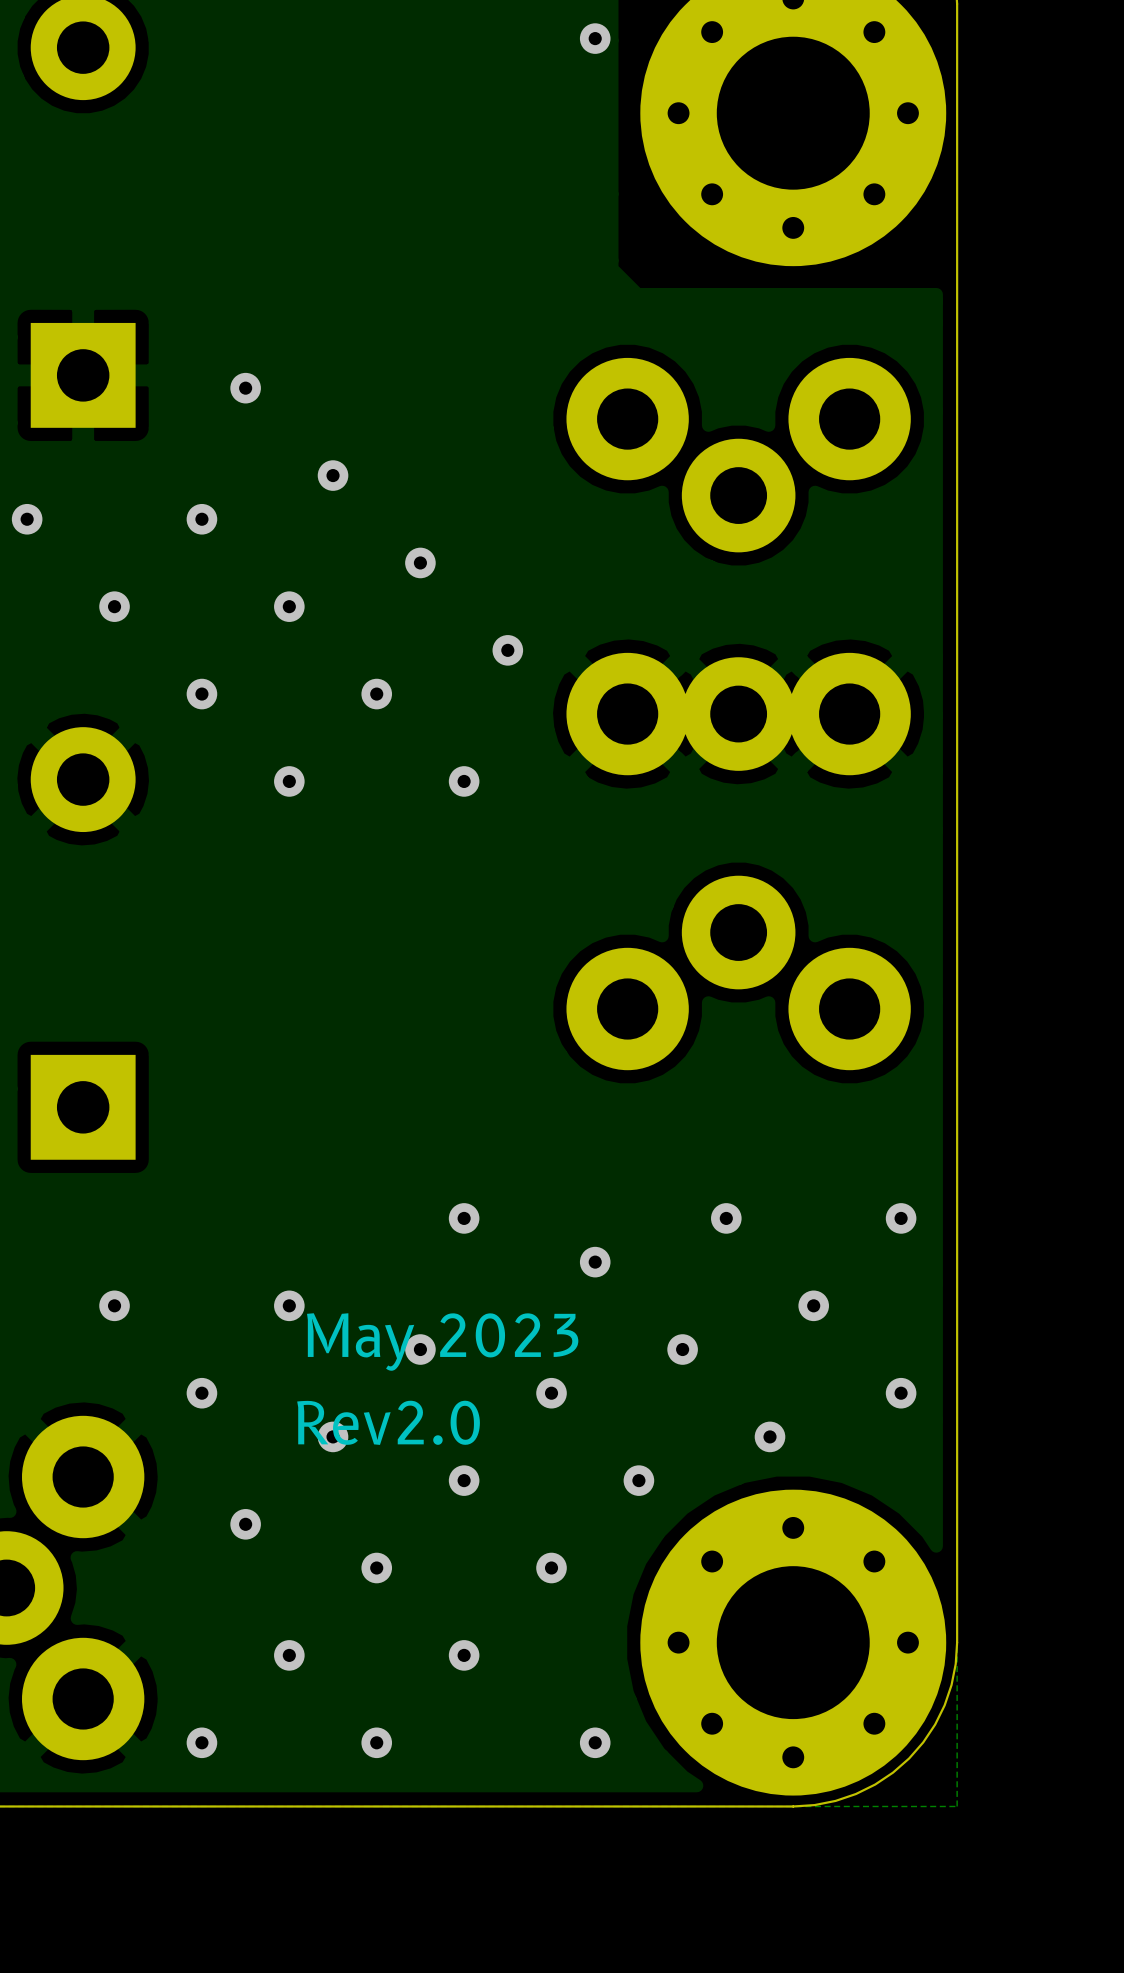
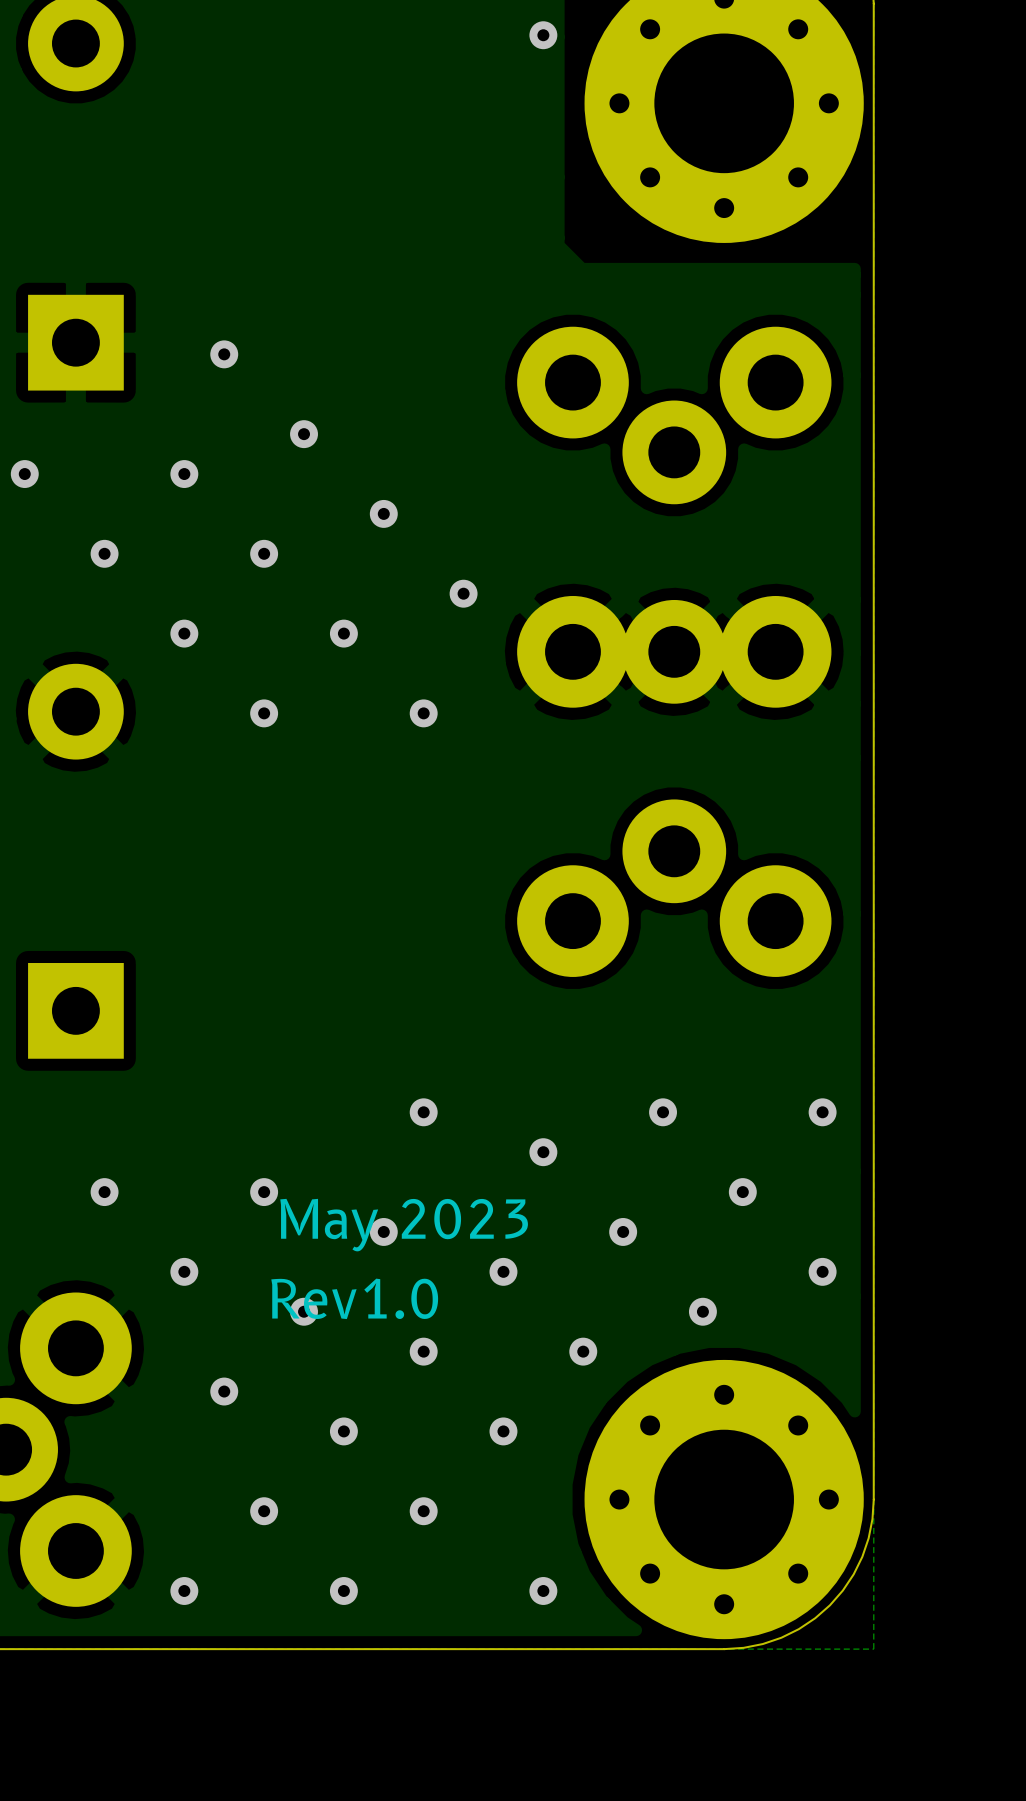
text: Rev2.0 (388, 1422) -> Rev1.0 (354, 1298)

